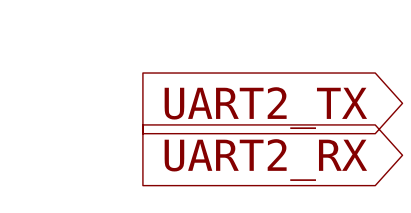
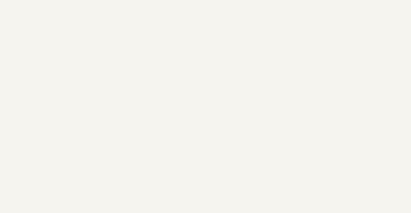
global label: UART2_TX (265, 108) -> none
global label: UART2_RX (265, 160) -> none

